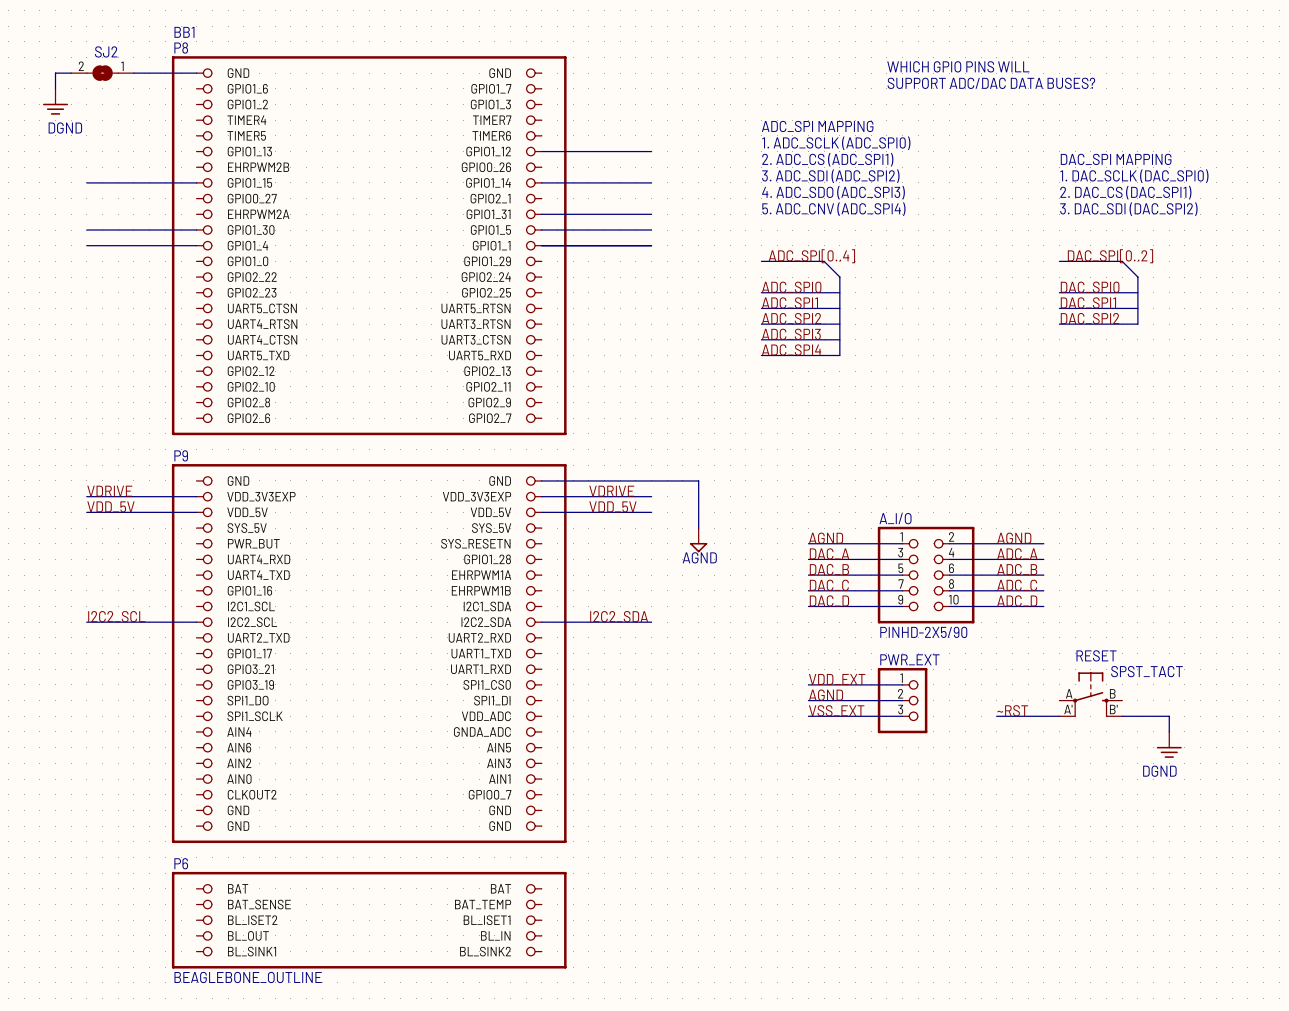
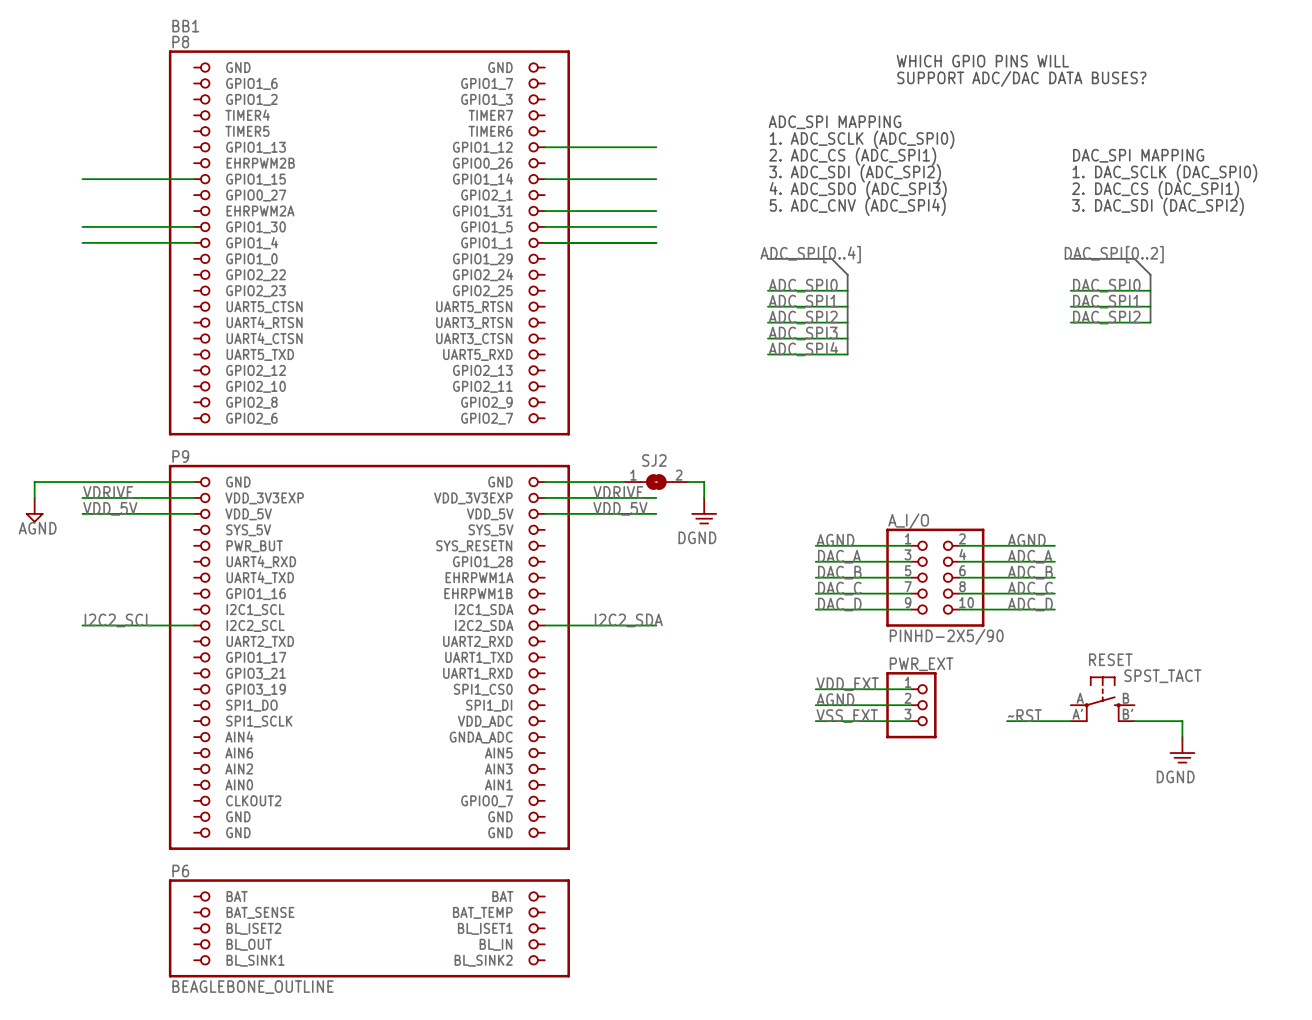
wire: (71, 73) (55, 73) (55, 88) -> none
SJ2 rotation: 0° (102, 73) -> 180° (656, 482)
SJ2 position: (102, 73) -> (656, 482)
wire: (133, 73) (196, 73) -> none
power symbol: DGND (55, 101) -> none
wire: none -> (194, 482) (34, 482) (34, 497)
power symbol: none -> AGND (34, 510)
power symbol: none -> DGND (704, 511)
power symbol: AGND (698, 540) -> none

